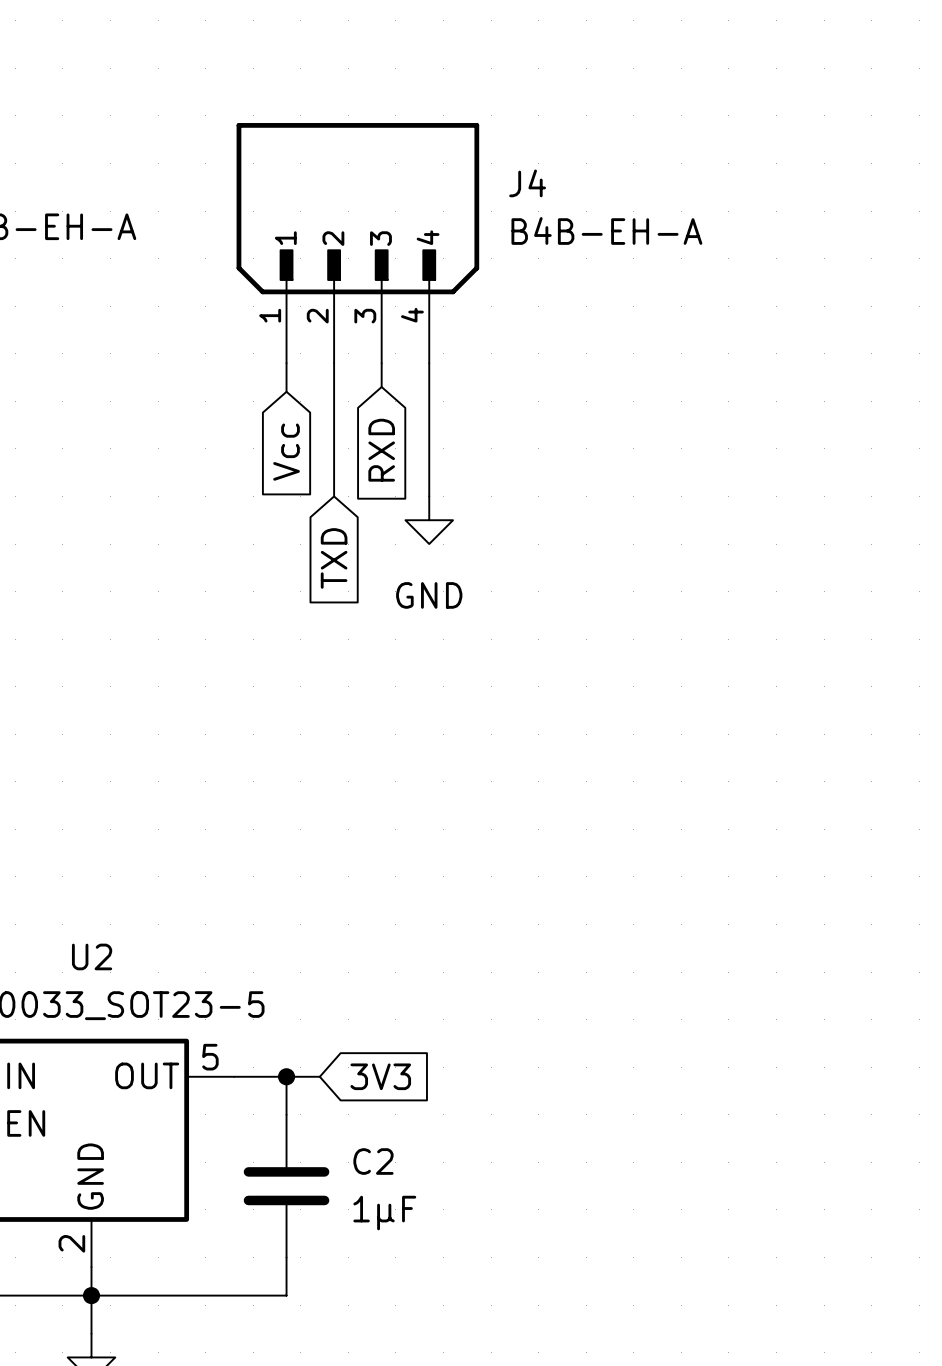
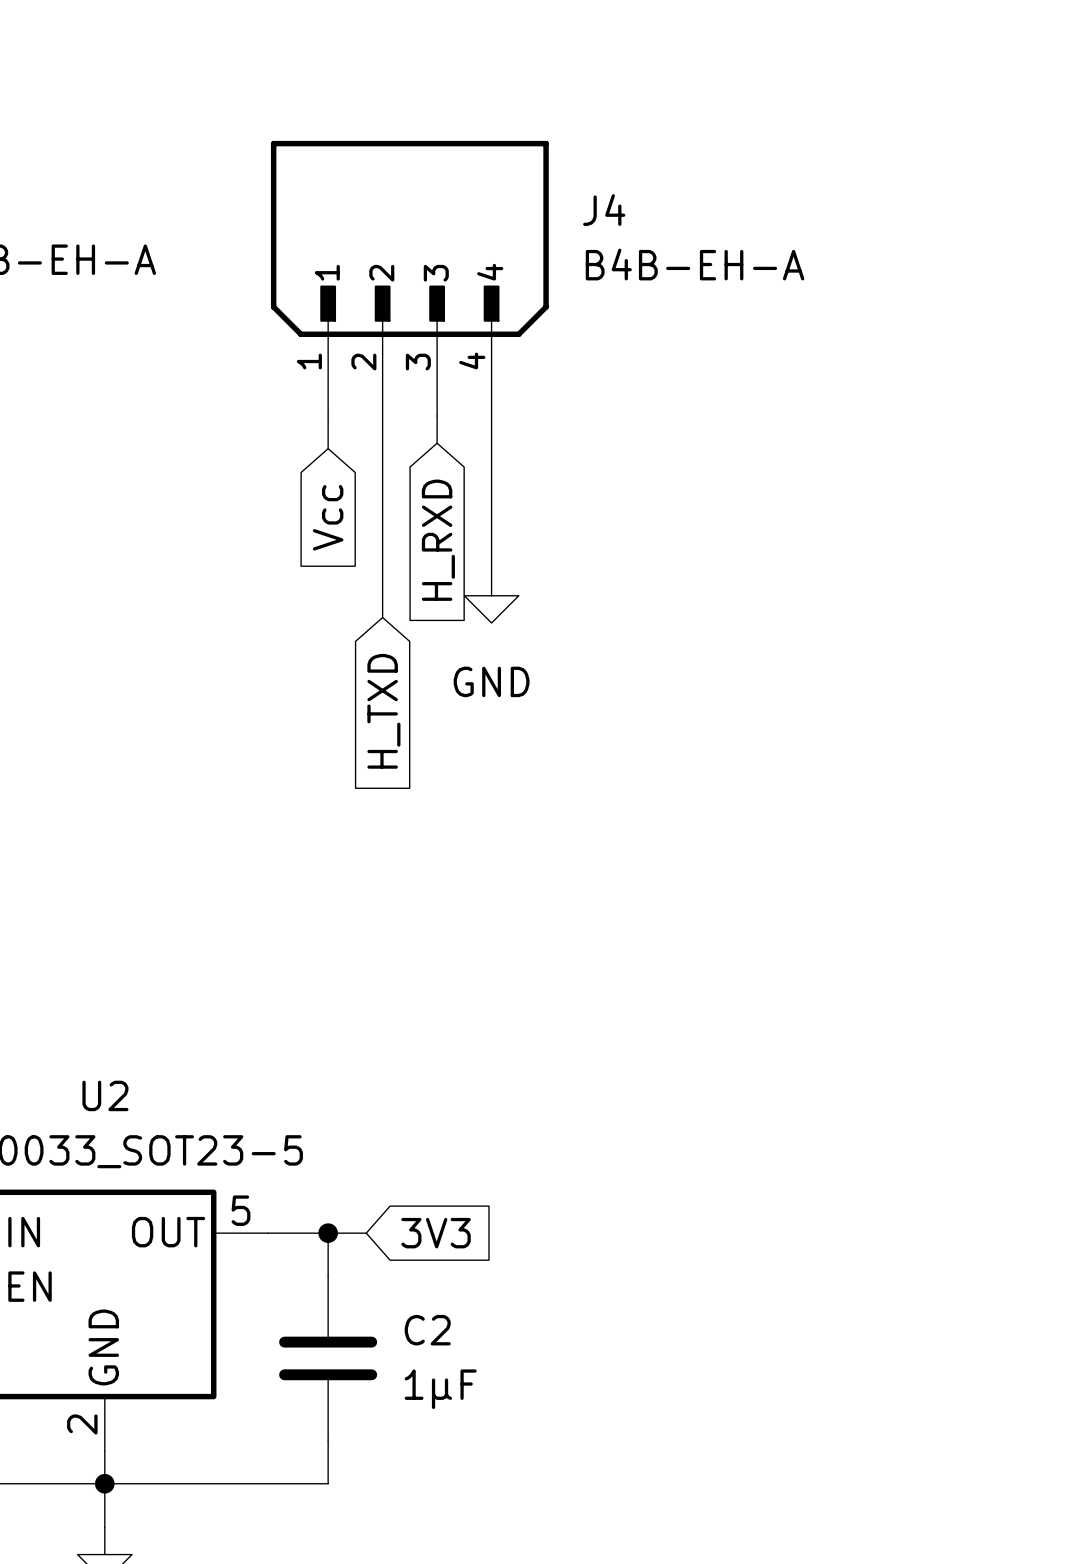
global label: RXD (381, 450) -> H_RXD (438, 540)
wire: none -> (382, 568) (382, 617)
global label: TXD (334, 558) -> H_TXD (383, 711)

